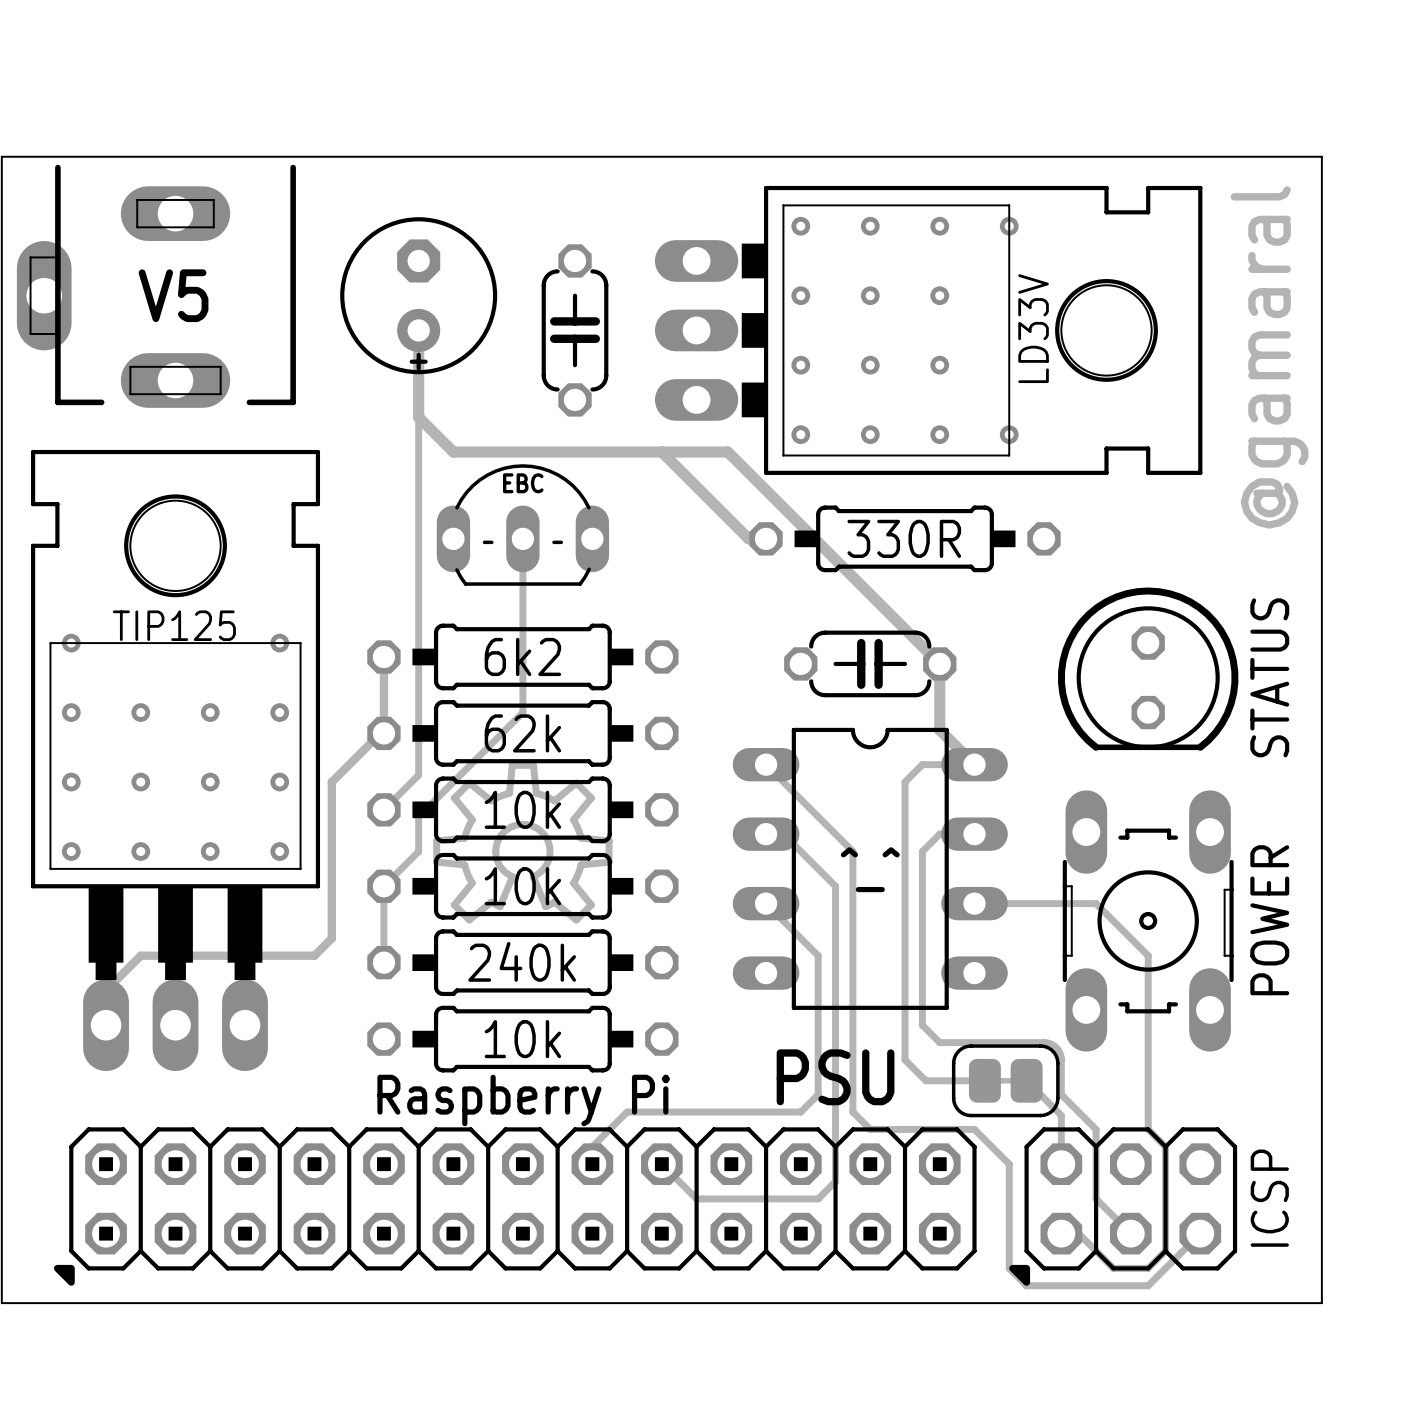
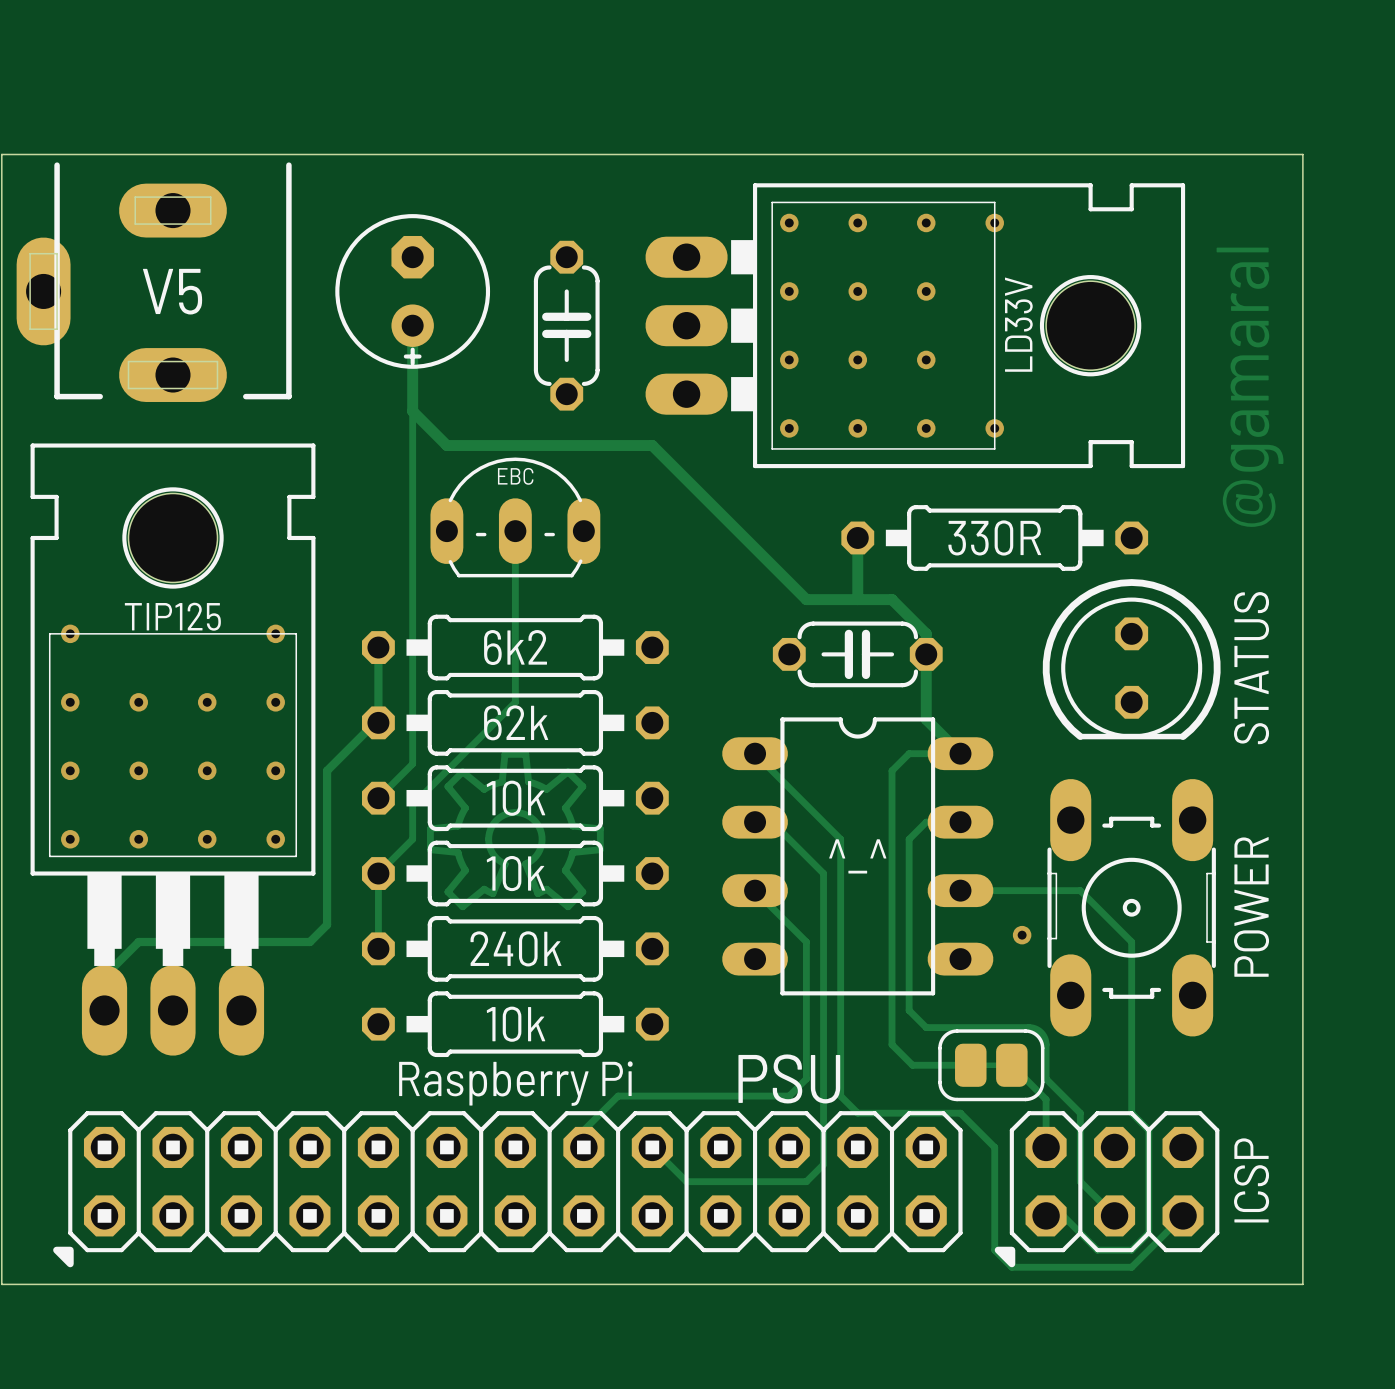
track: (661, 452) (727, 452) (939, 663) -> (737, 531) (806, 599) (892, 599) (926, 633) (926, 654)
part position: (905, 538) -> (994, 537)
track: none -> (857, 537) (857, 599)
part rotation: 0° (1148, 920) -> 180° (1131, 907)
via: none -> (1022, 935)
text position: PSU (835, 1077) -> PSU (789, 1078)

